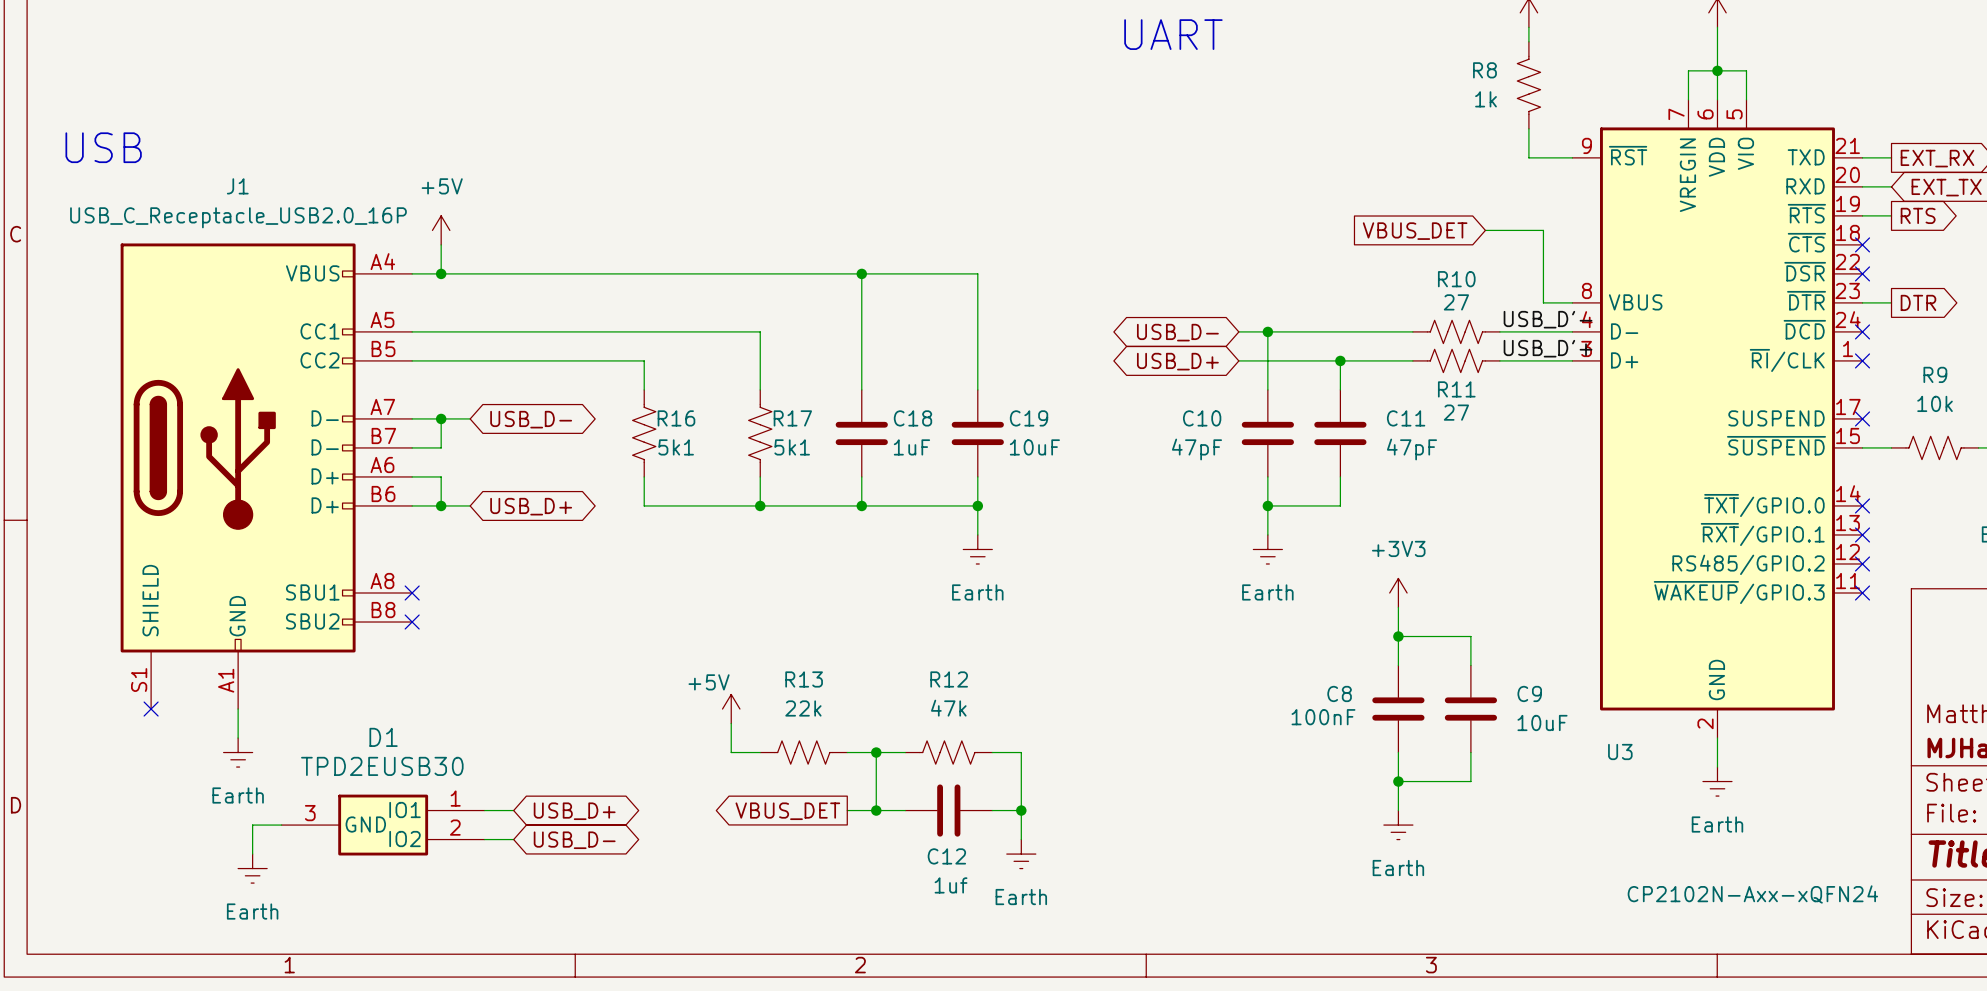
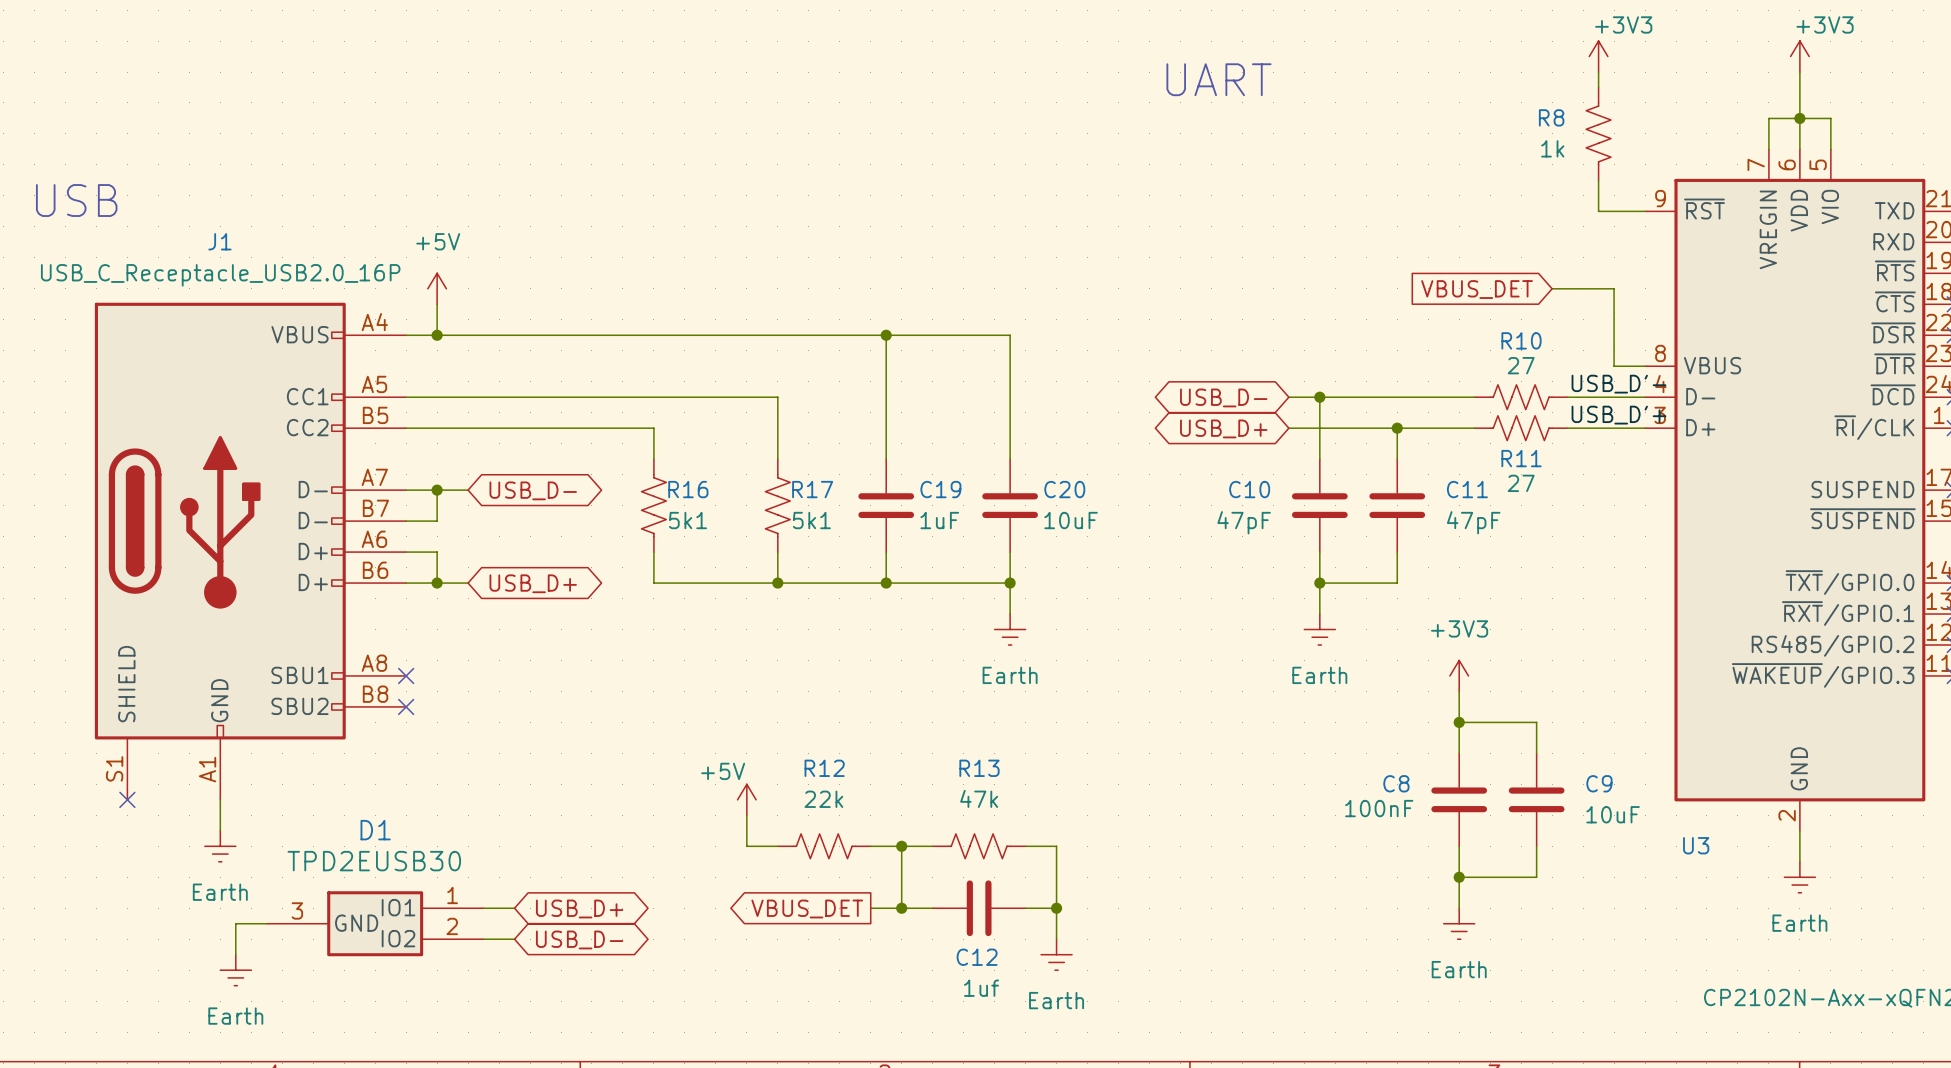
C18 name: C18 (912, 418) -> C19 (940, 489)
C19 name: C19 (1029, 418) -> C20 (1064, 489)
R13 name: R13 (804, 679) -> R12 (824, 768)
R12 name: R12 (949, 679) -> R13 (979, 768)

